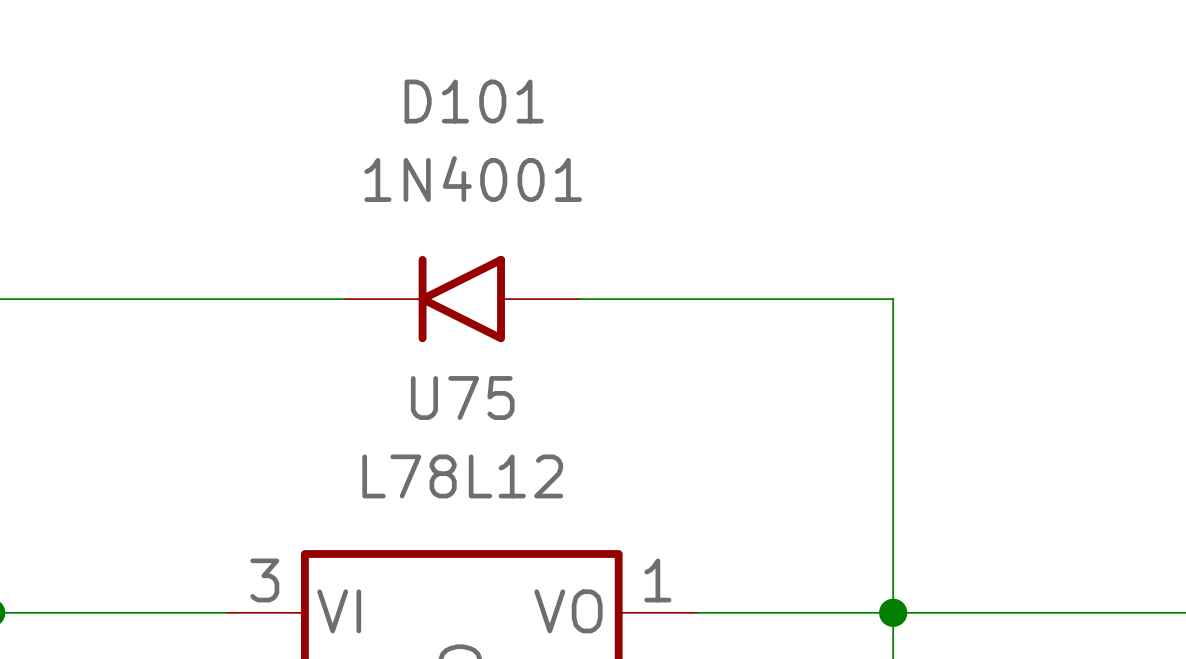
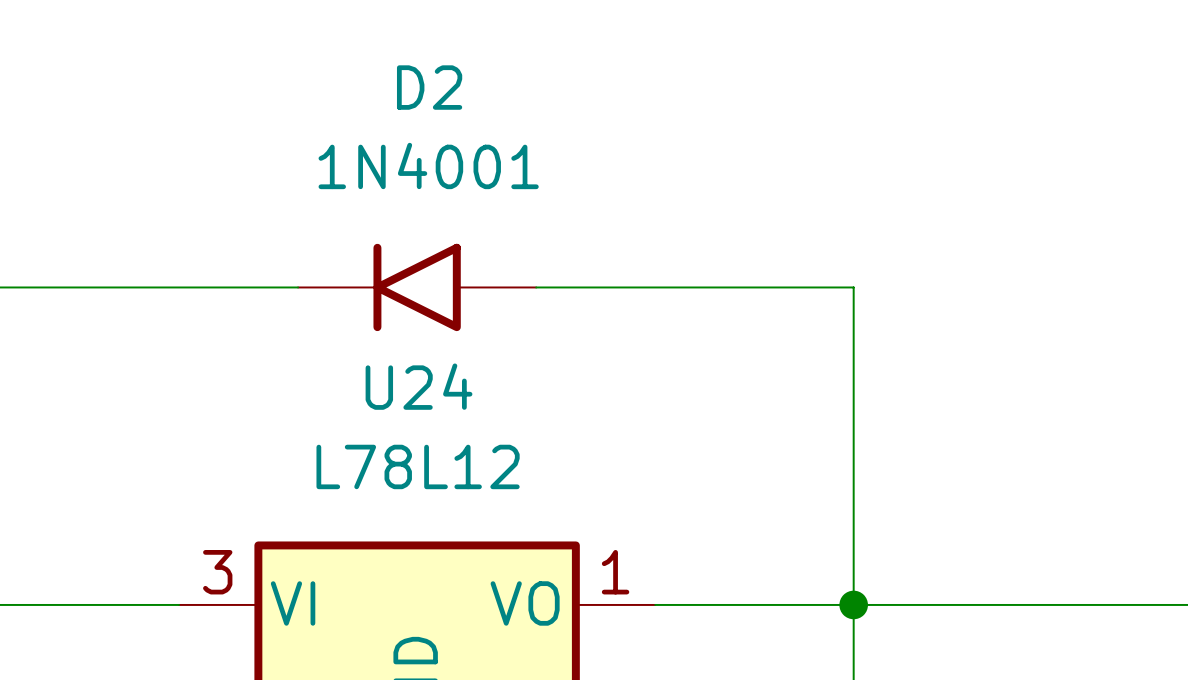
D101 name: D101 (474, 101) -> D2 (429, 87)
U75 name: U75 (462, 398) -> U24 (419, 386)

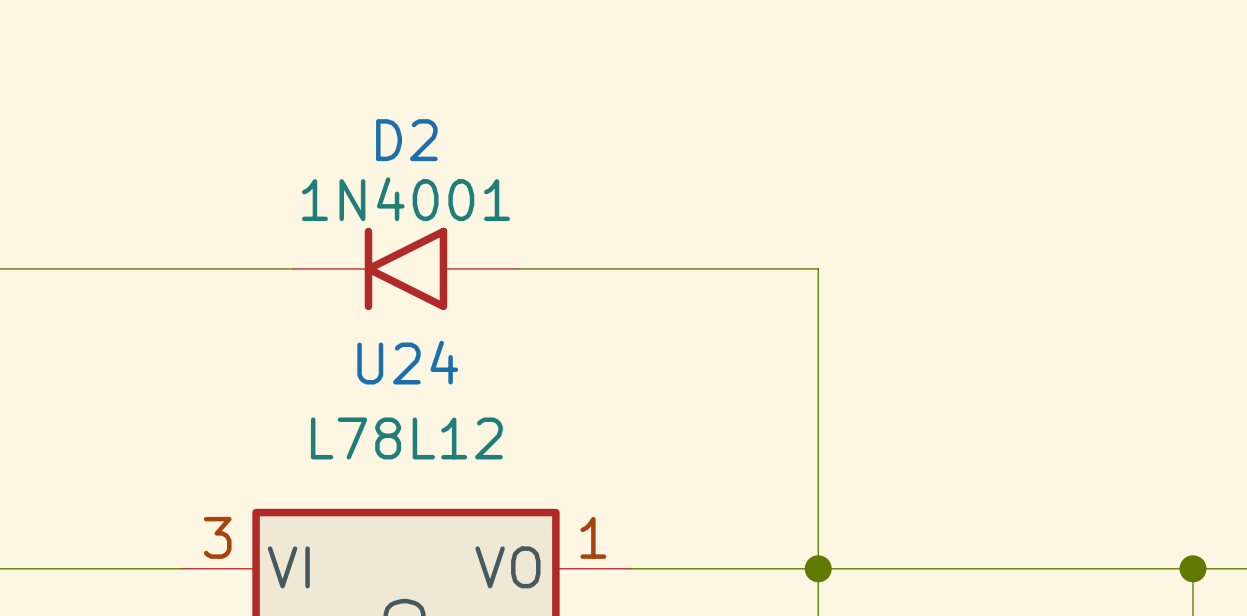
D2 name position: D2 (429, 87) -> D2 (406, 140)
D2 value position: 1N4001 (428, 165) -> 1N4001 (405, 199)

